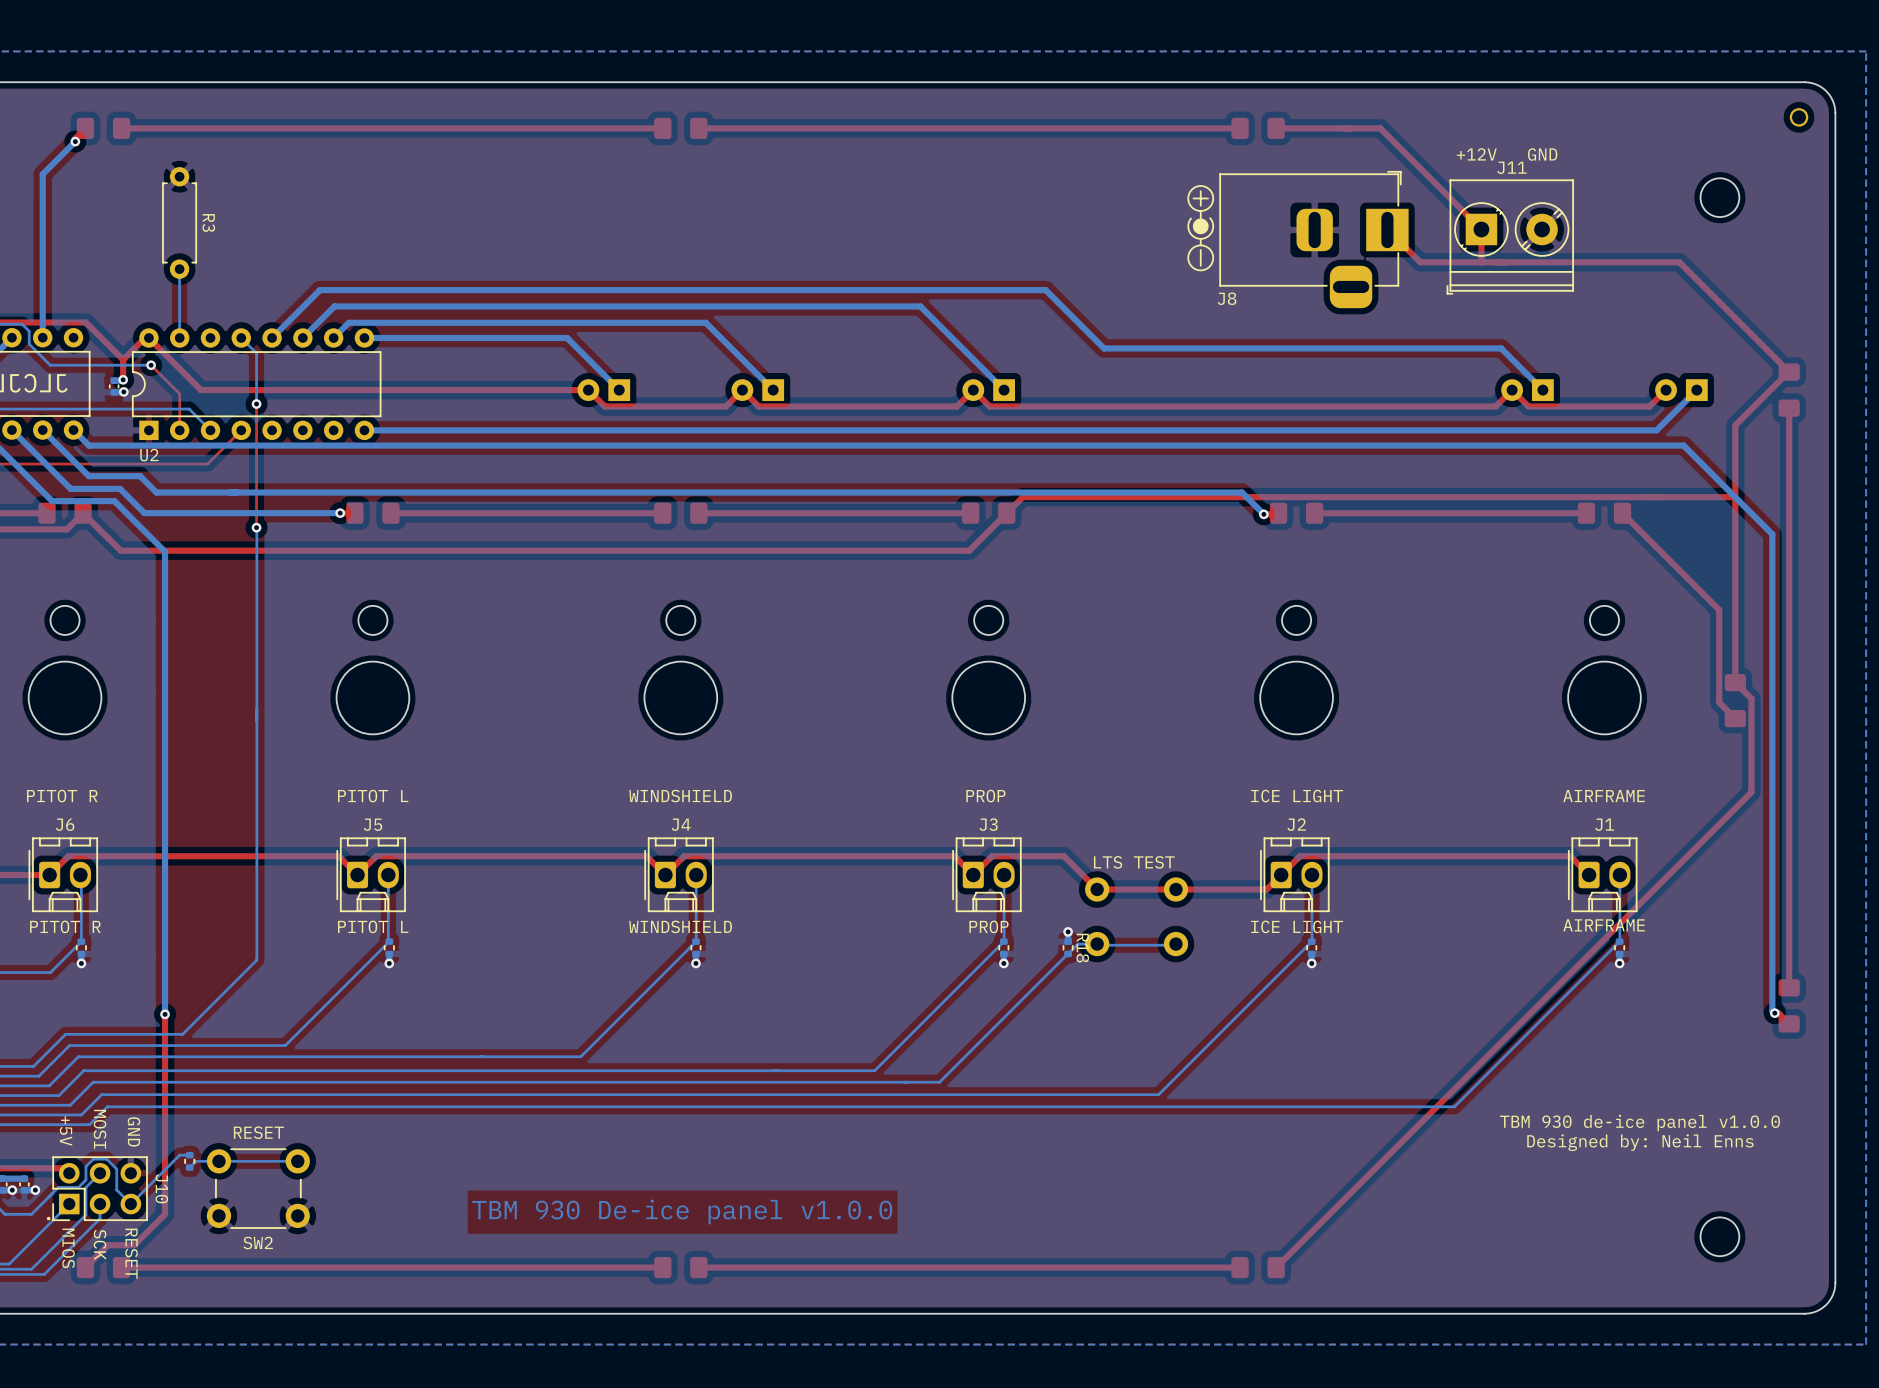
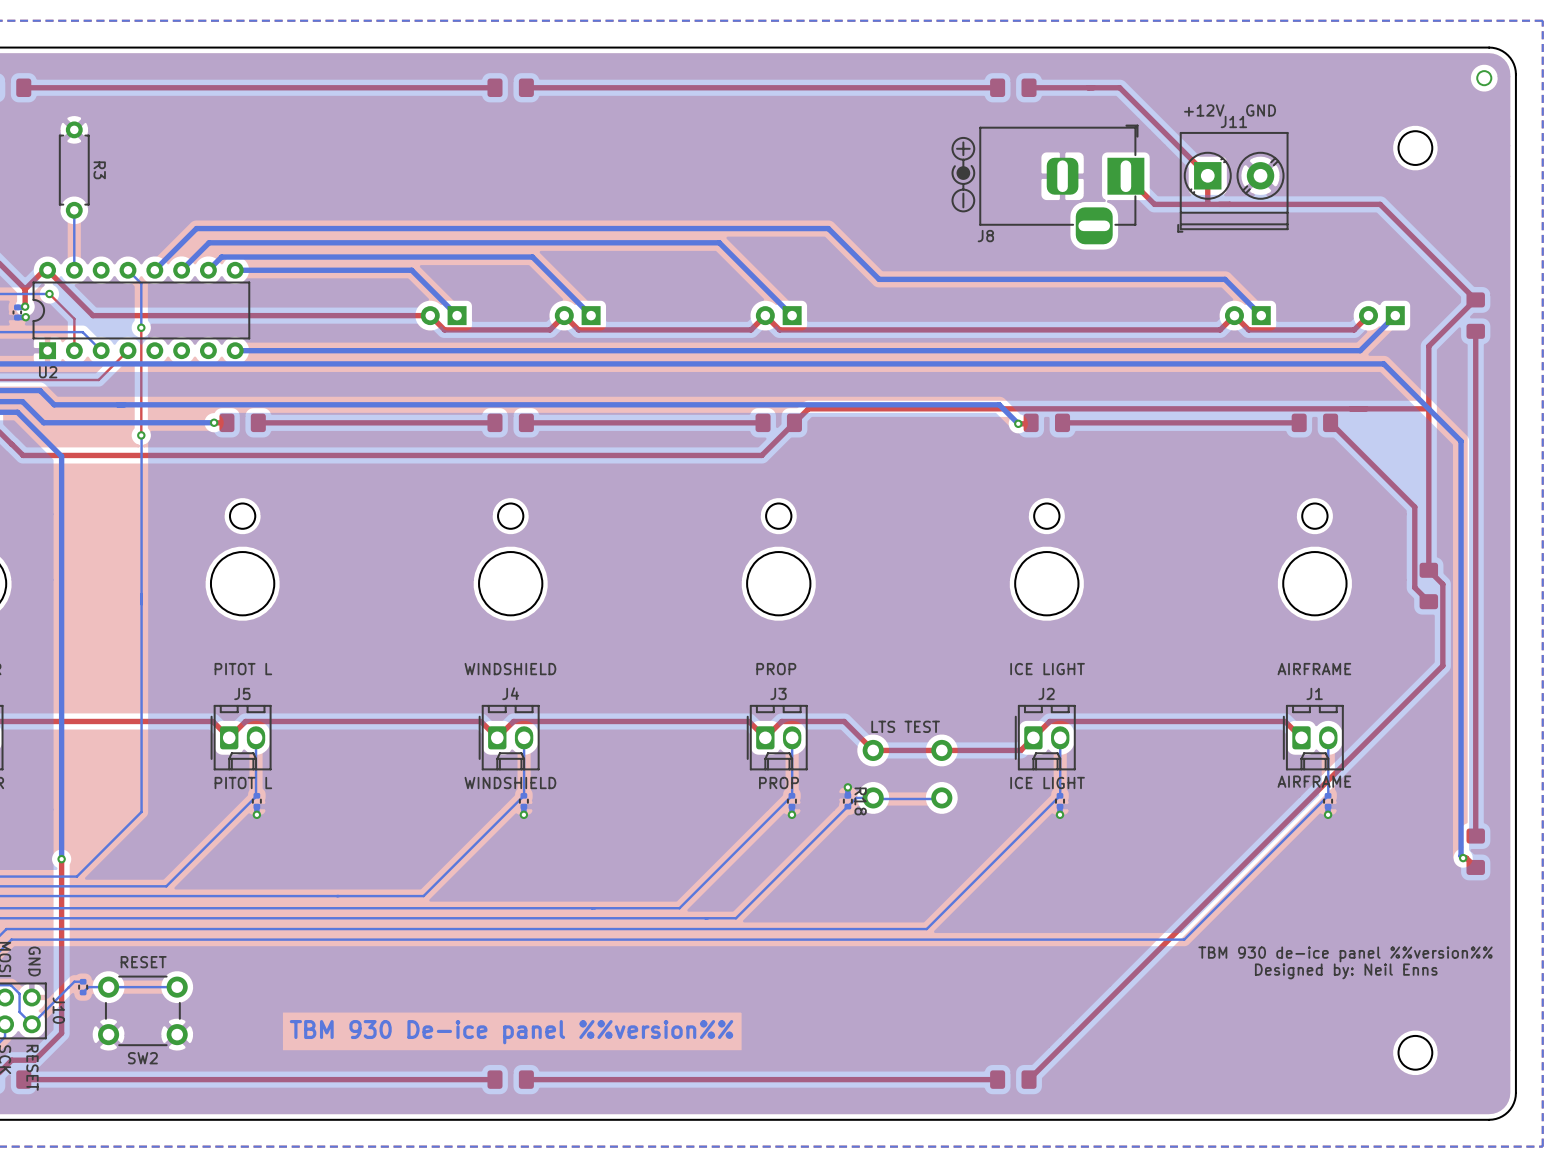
text: TBM 930 de-ice panel v1.0.0 (1639, 1123) -> TBM 930 de-ice panel %%version%% (1345, 954)
text: TBM 930 De-ice panel v1.0.0 (682, 1212) -> TBM 930 De-ice panel %%version%% (511, 1032)

